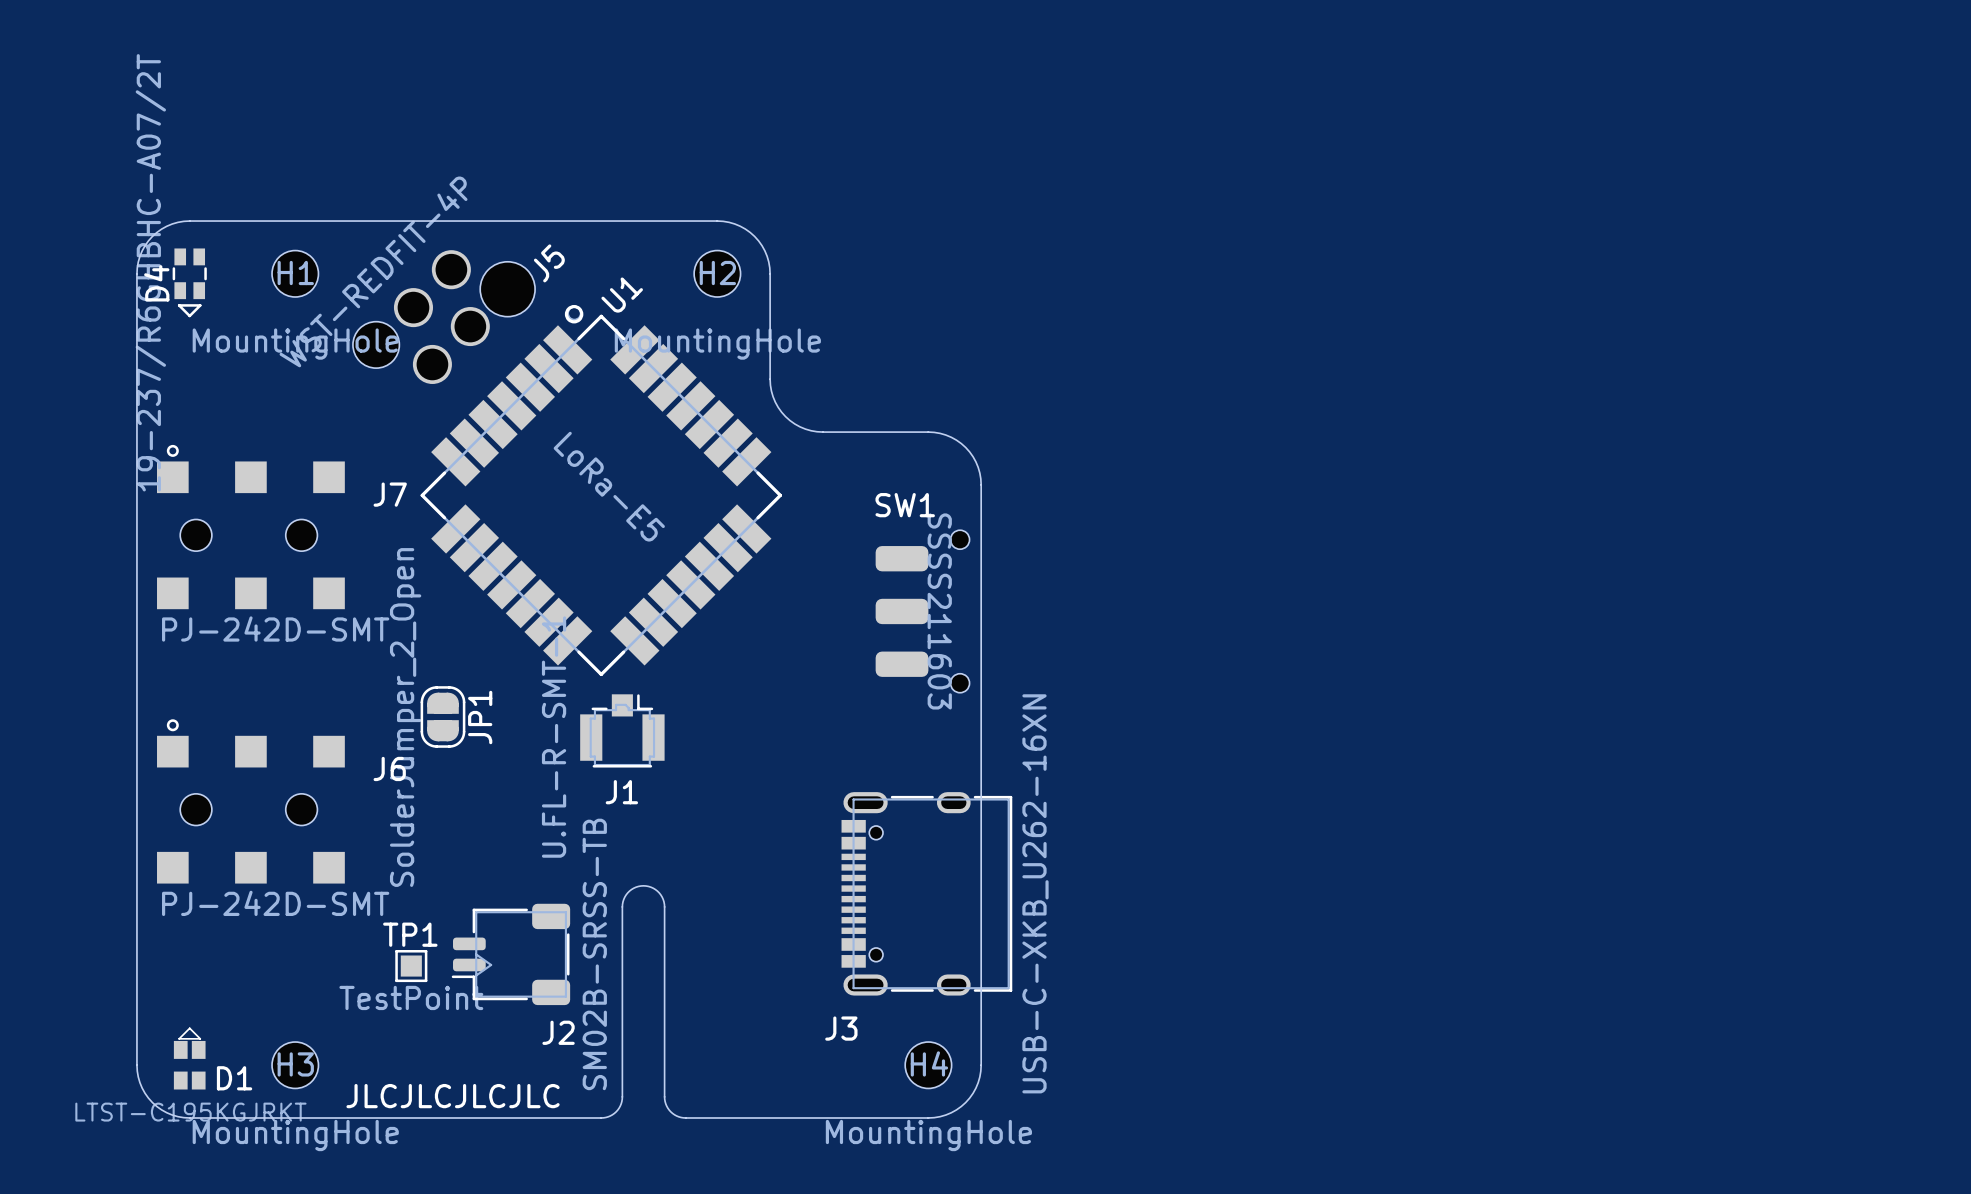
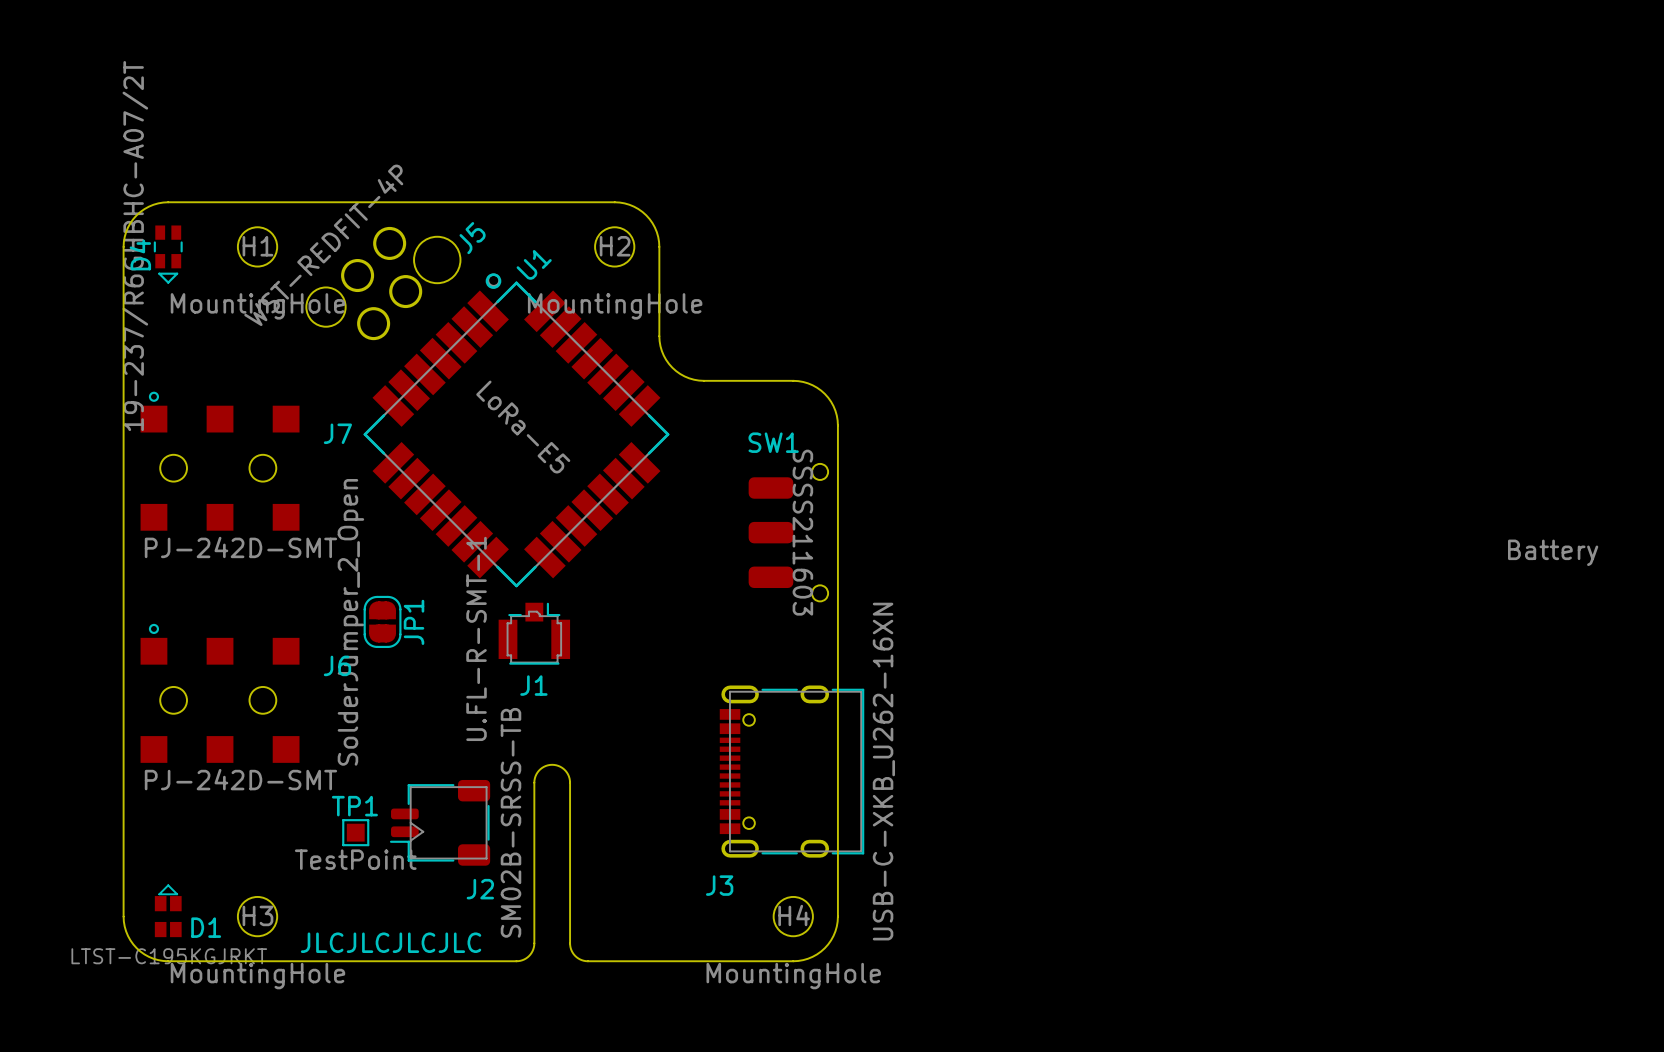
drawing: none -> [1507, 539, 1599, 567]

